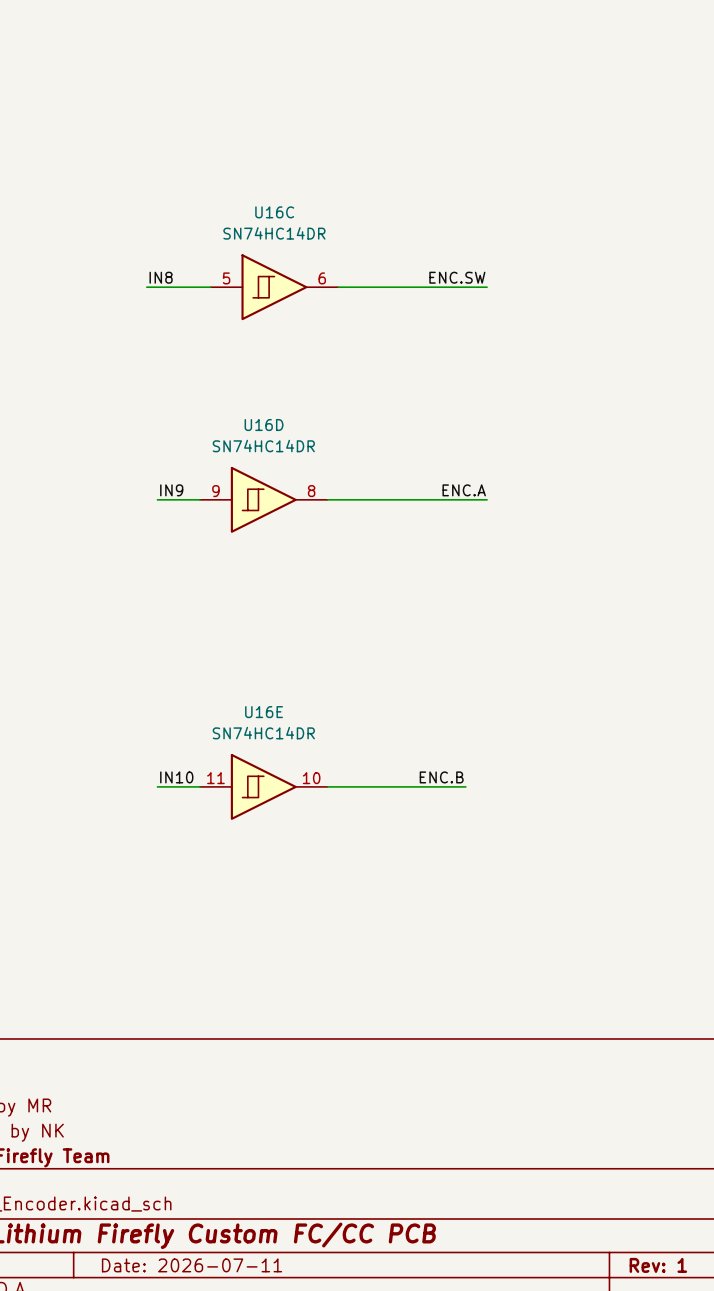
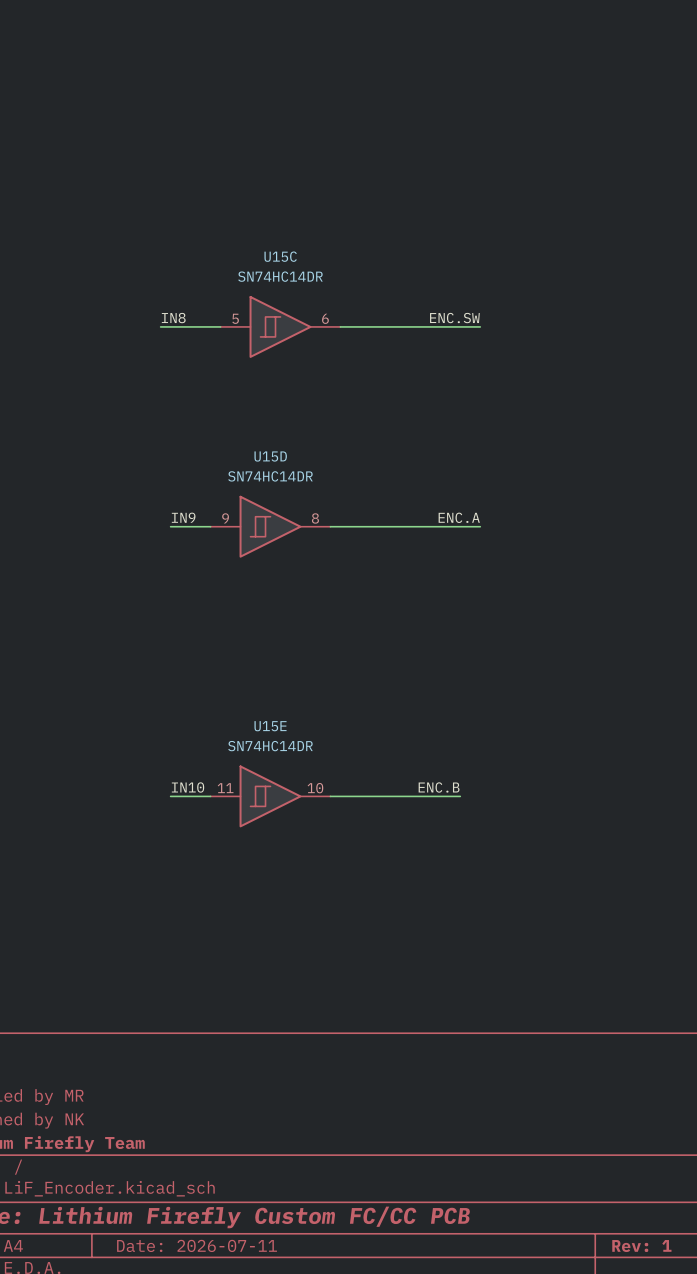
U16C name: U16C (274, 212) -> U15C (280, 256)
U16D name: U16D (264, 425) -> U15D (270, 456)
U16E name: U16E (264, 712) -> U15E (270, 726)

